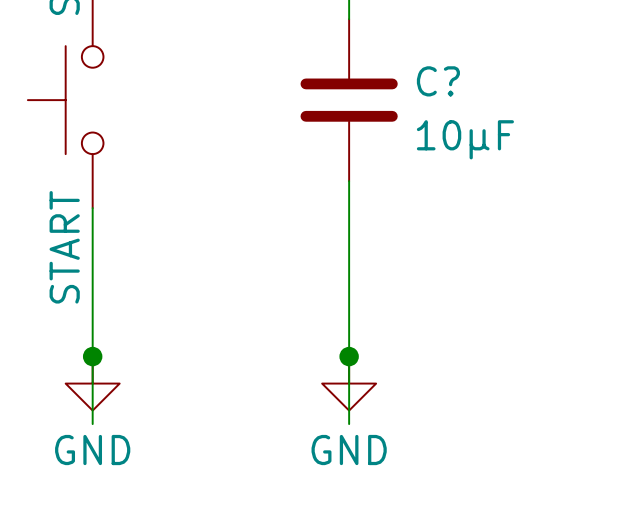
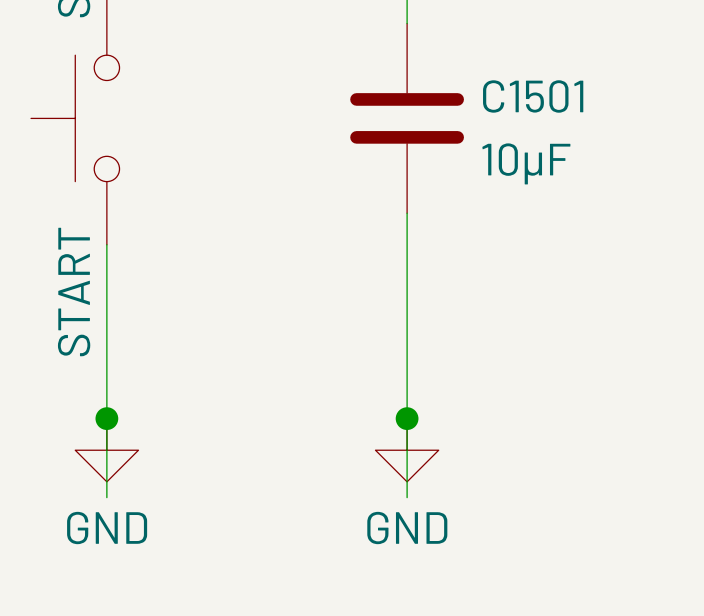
C? name: C? (438, 81) -> C1501 (533, 96)

